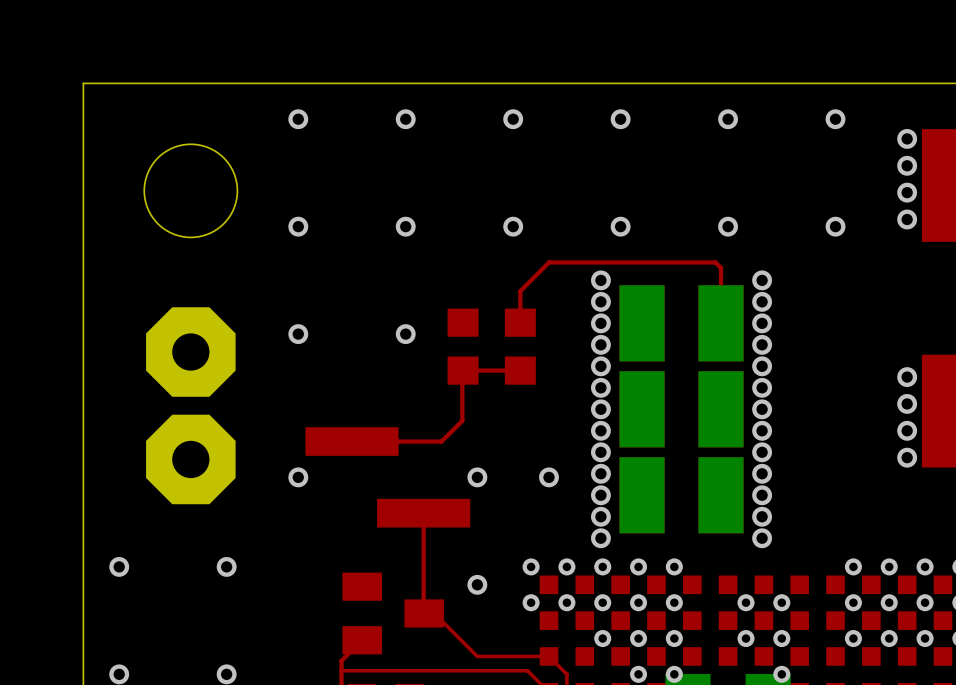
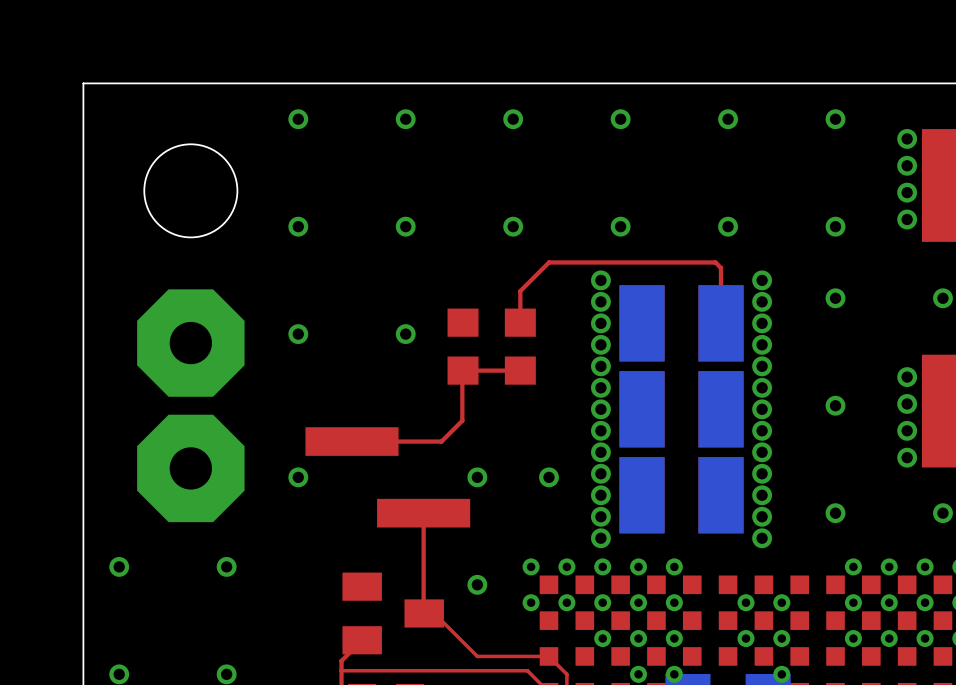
via: none -> (835, 298)
via: none -> (942, 298)
part footprint: [146, 307, 236, 397] -> [137, 289, 245, 397]
via: none -> (835, 405)
part footprint: [146, 414, 236, 505] -> [137, 414, 245, 523]
via: none -> (835, 513)
via: none -> (942, 513)

